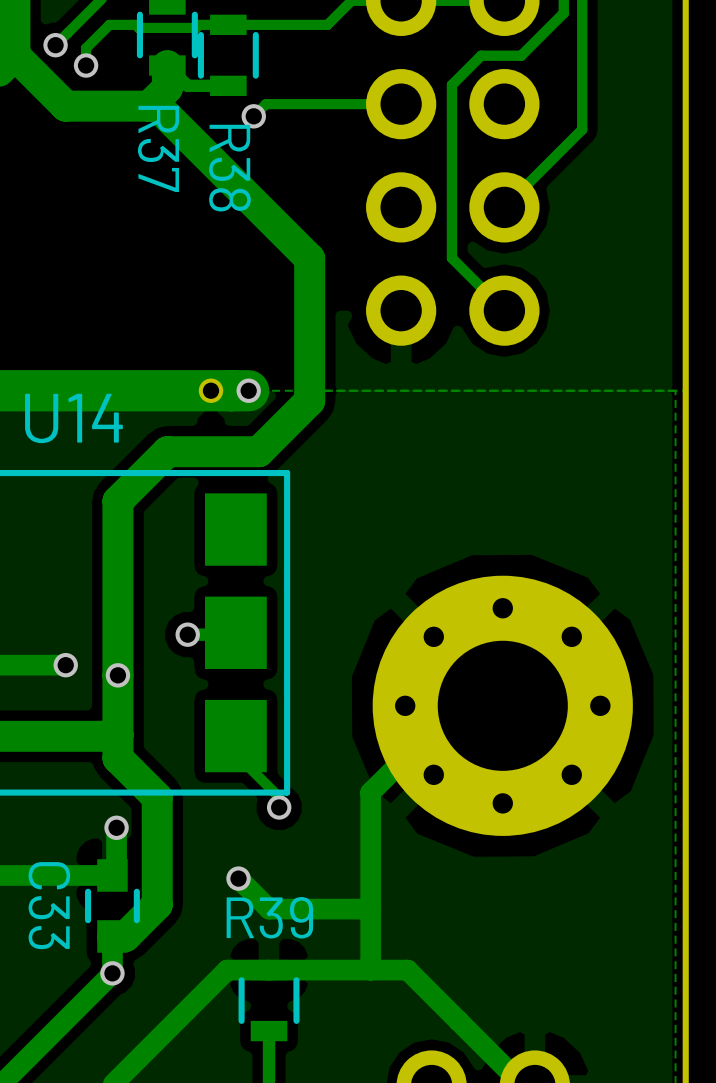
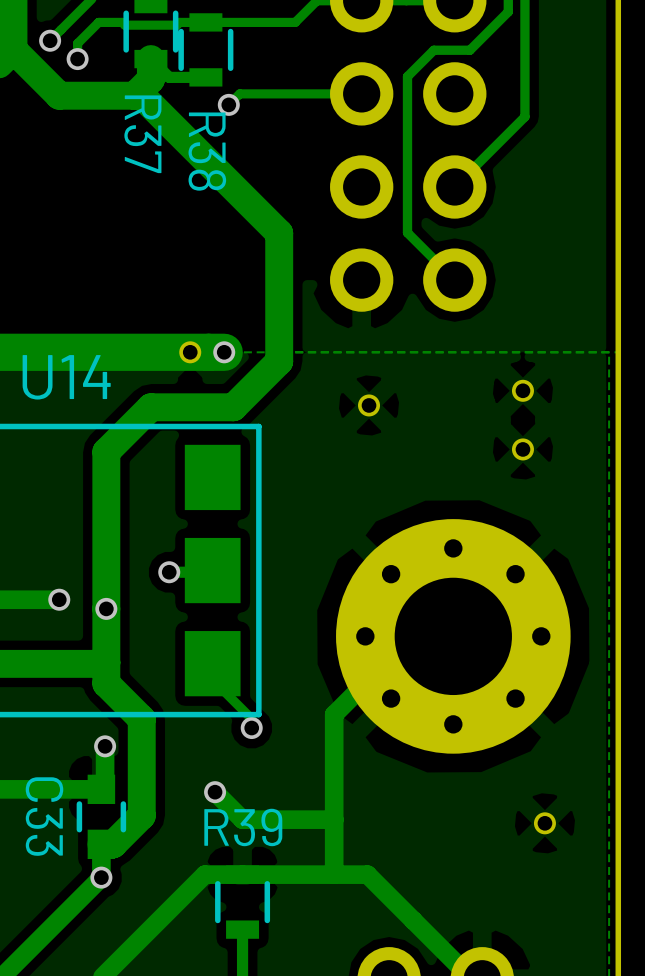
part: none -> (522, 390)
part: none -> (369, 405)
part: none -> (522, 449)
part: none -> (544, 823)

